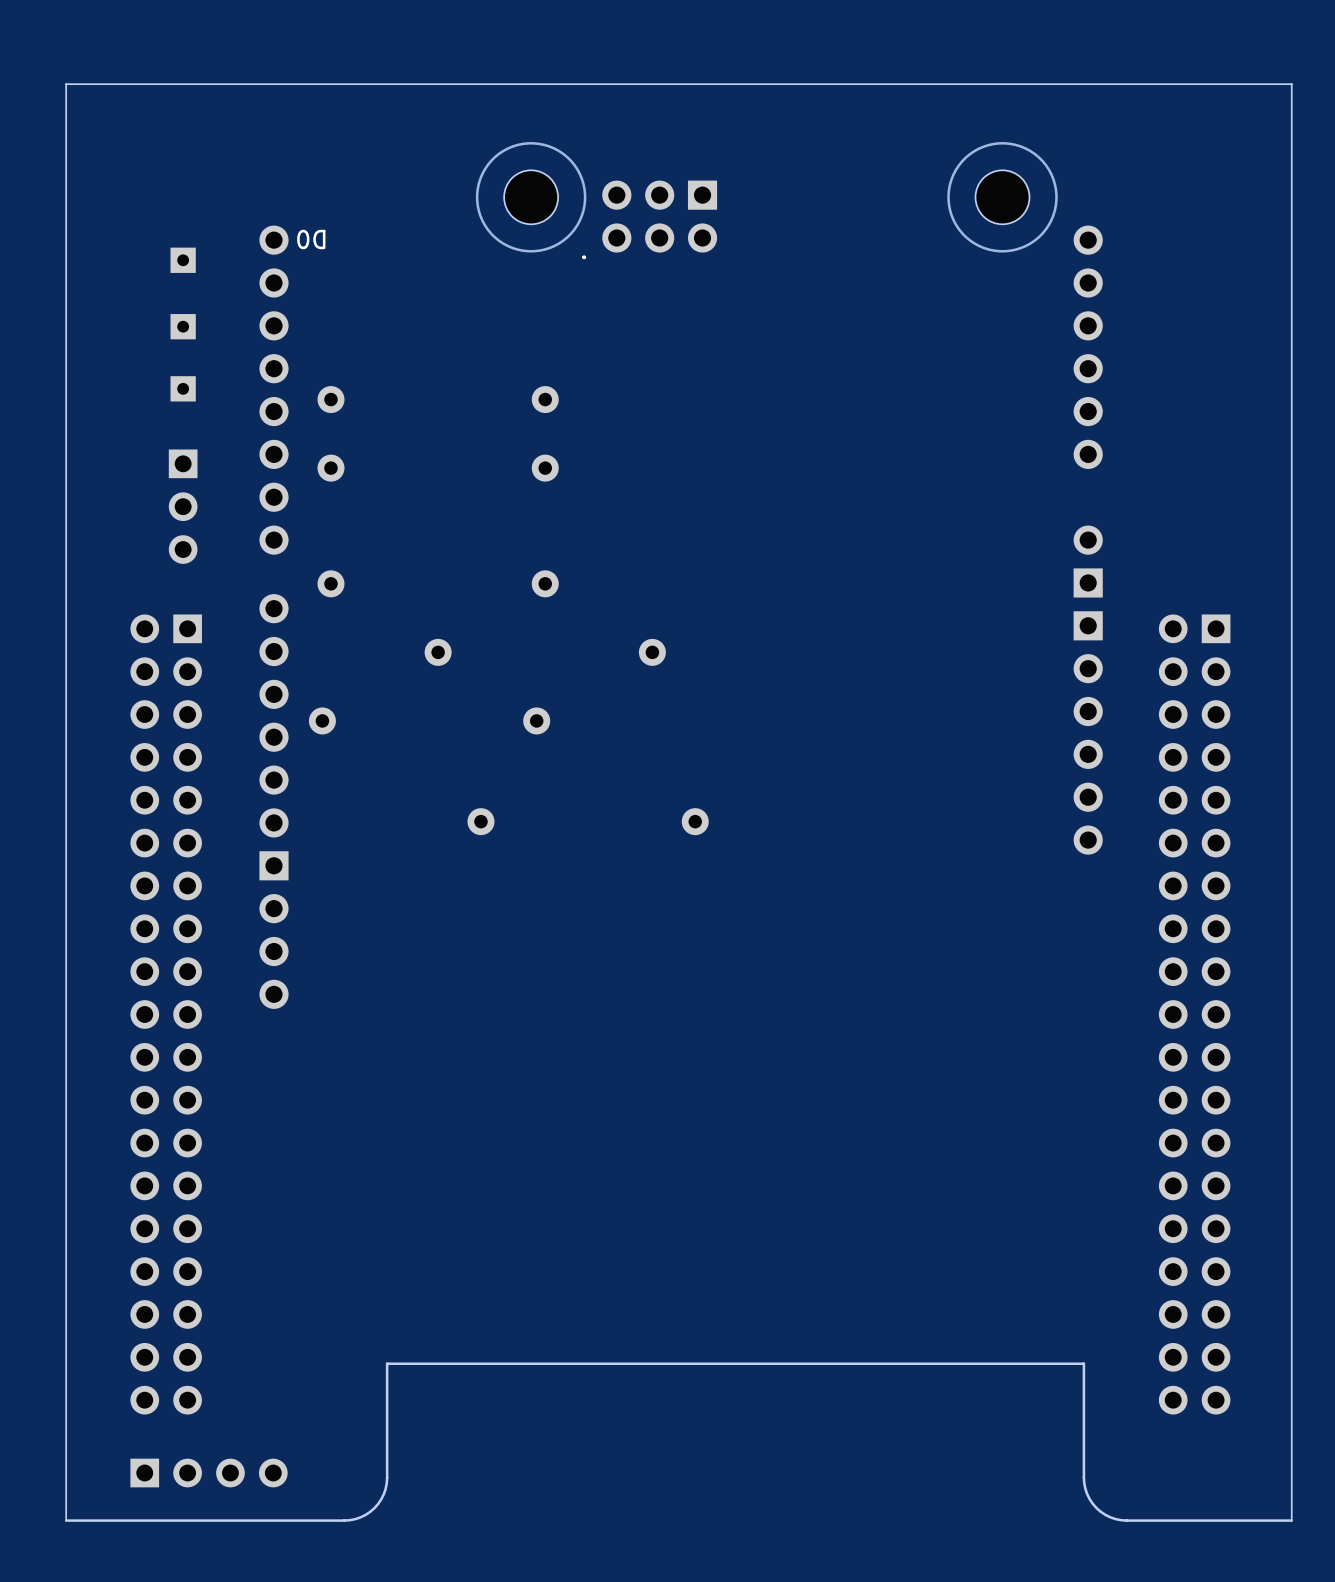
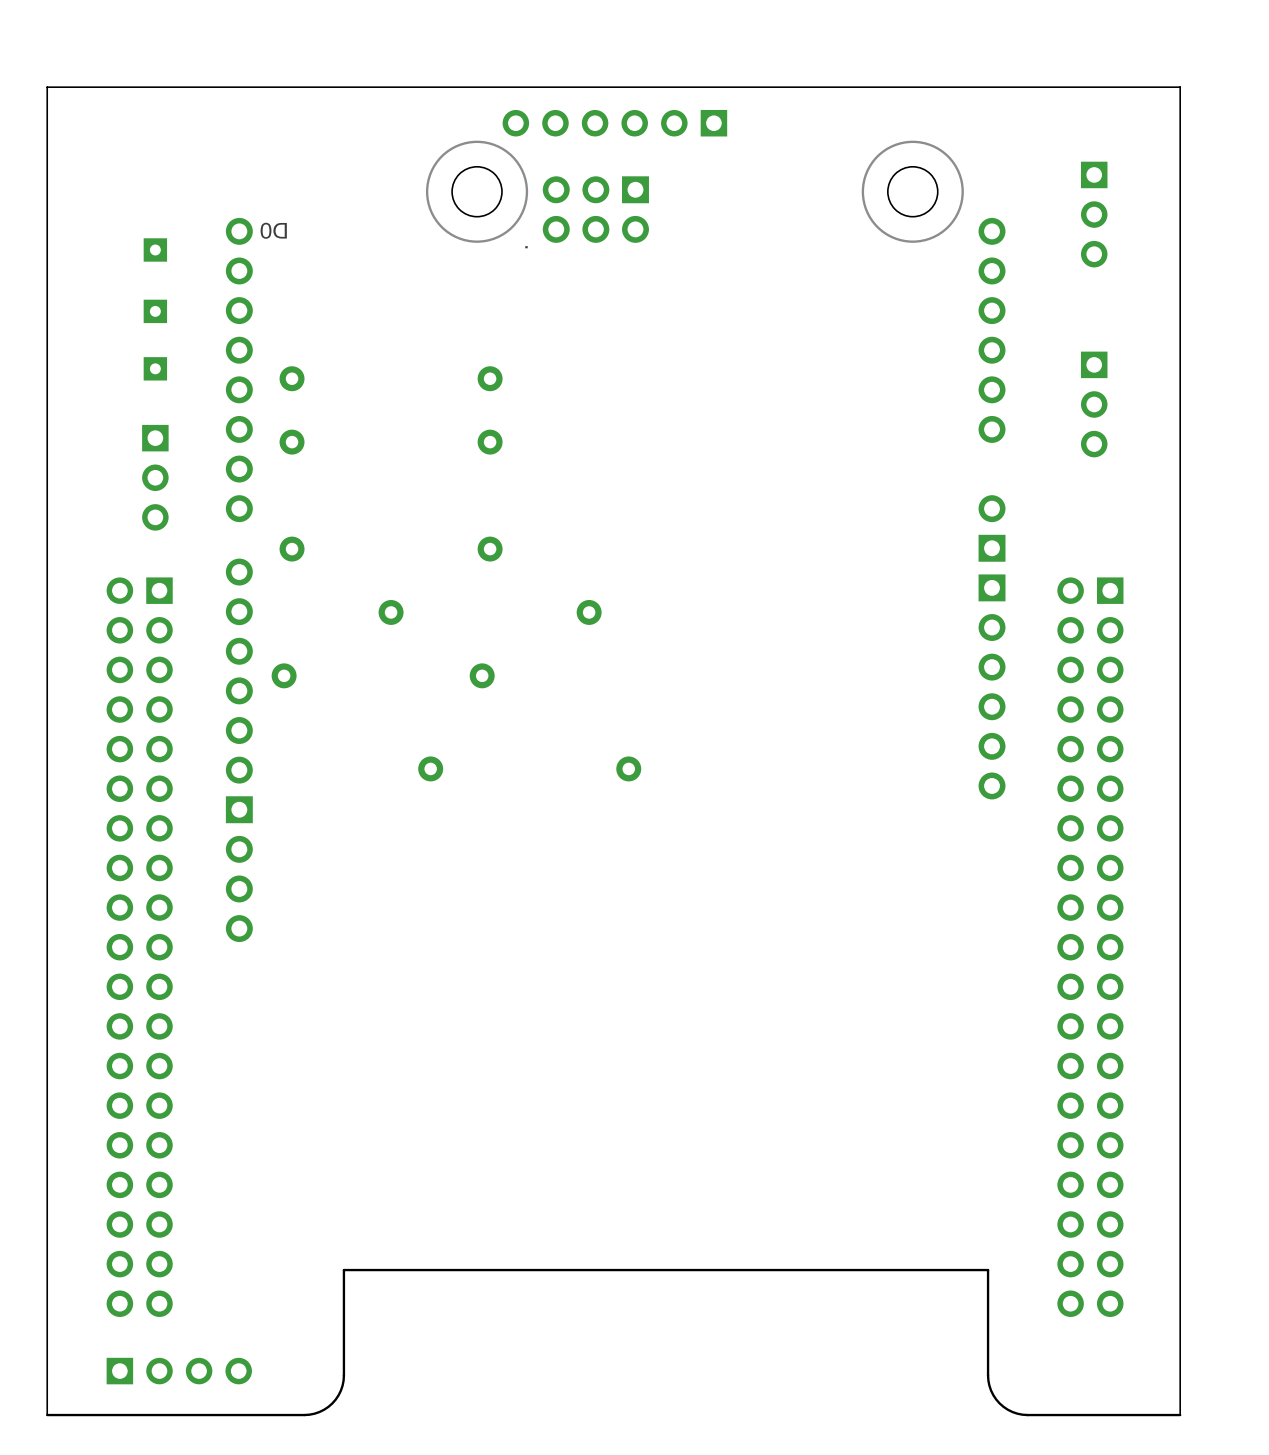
part: none -> (614, 123)
part: none -> (1094, 214)
part: none -> (1094, 404)

